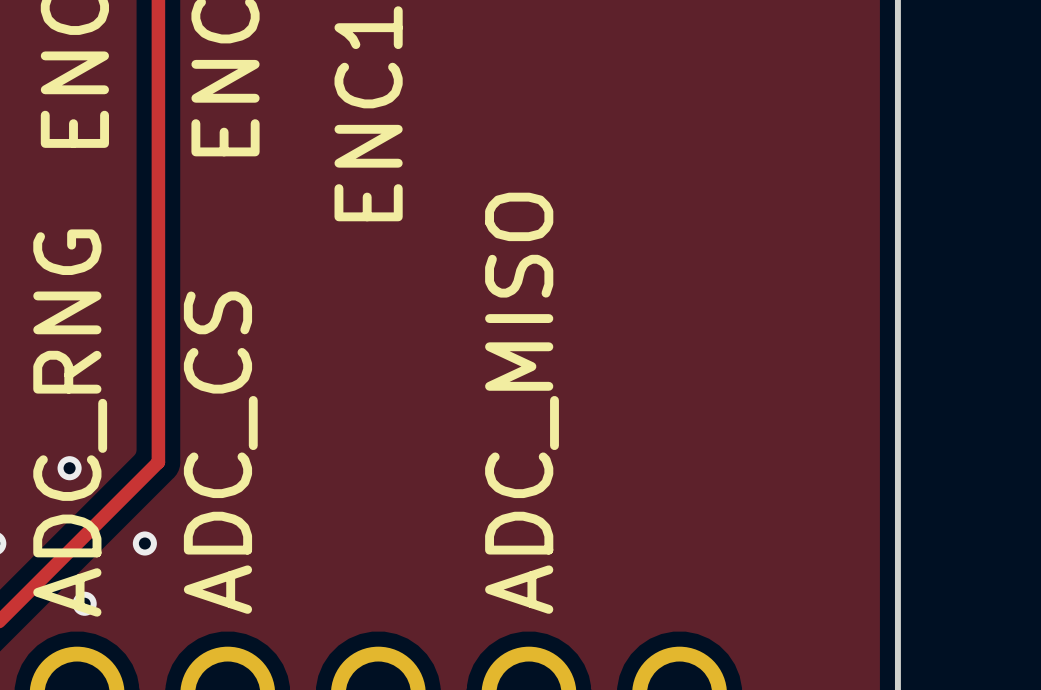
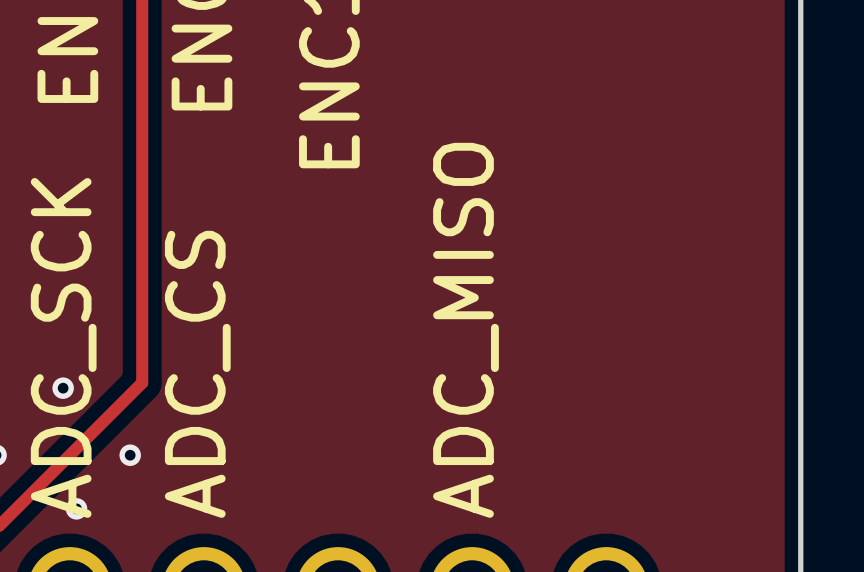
text: ADC_RNG (70, 423) -> ADC_SCK (63, 347)

